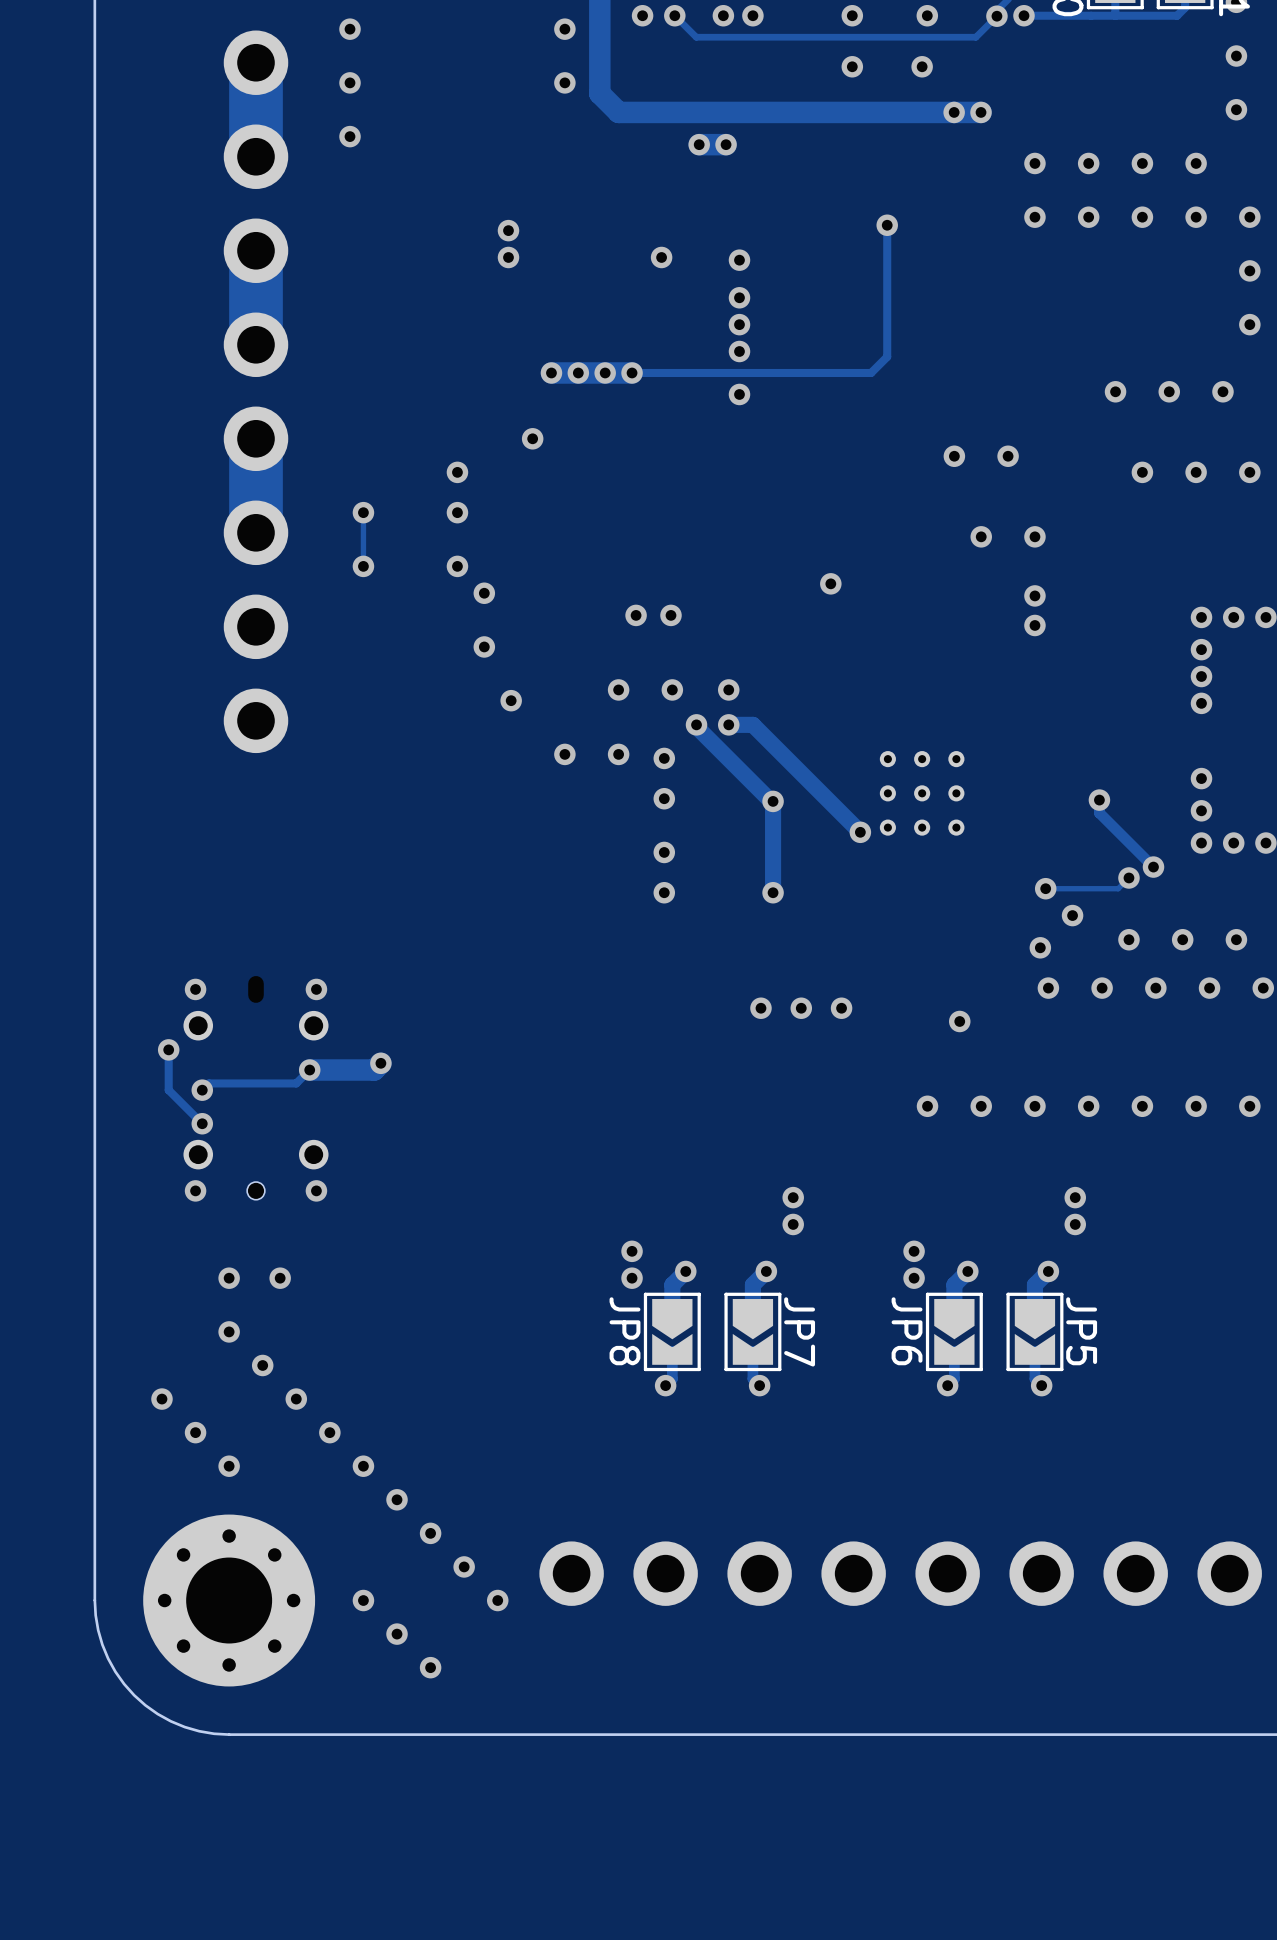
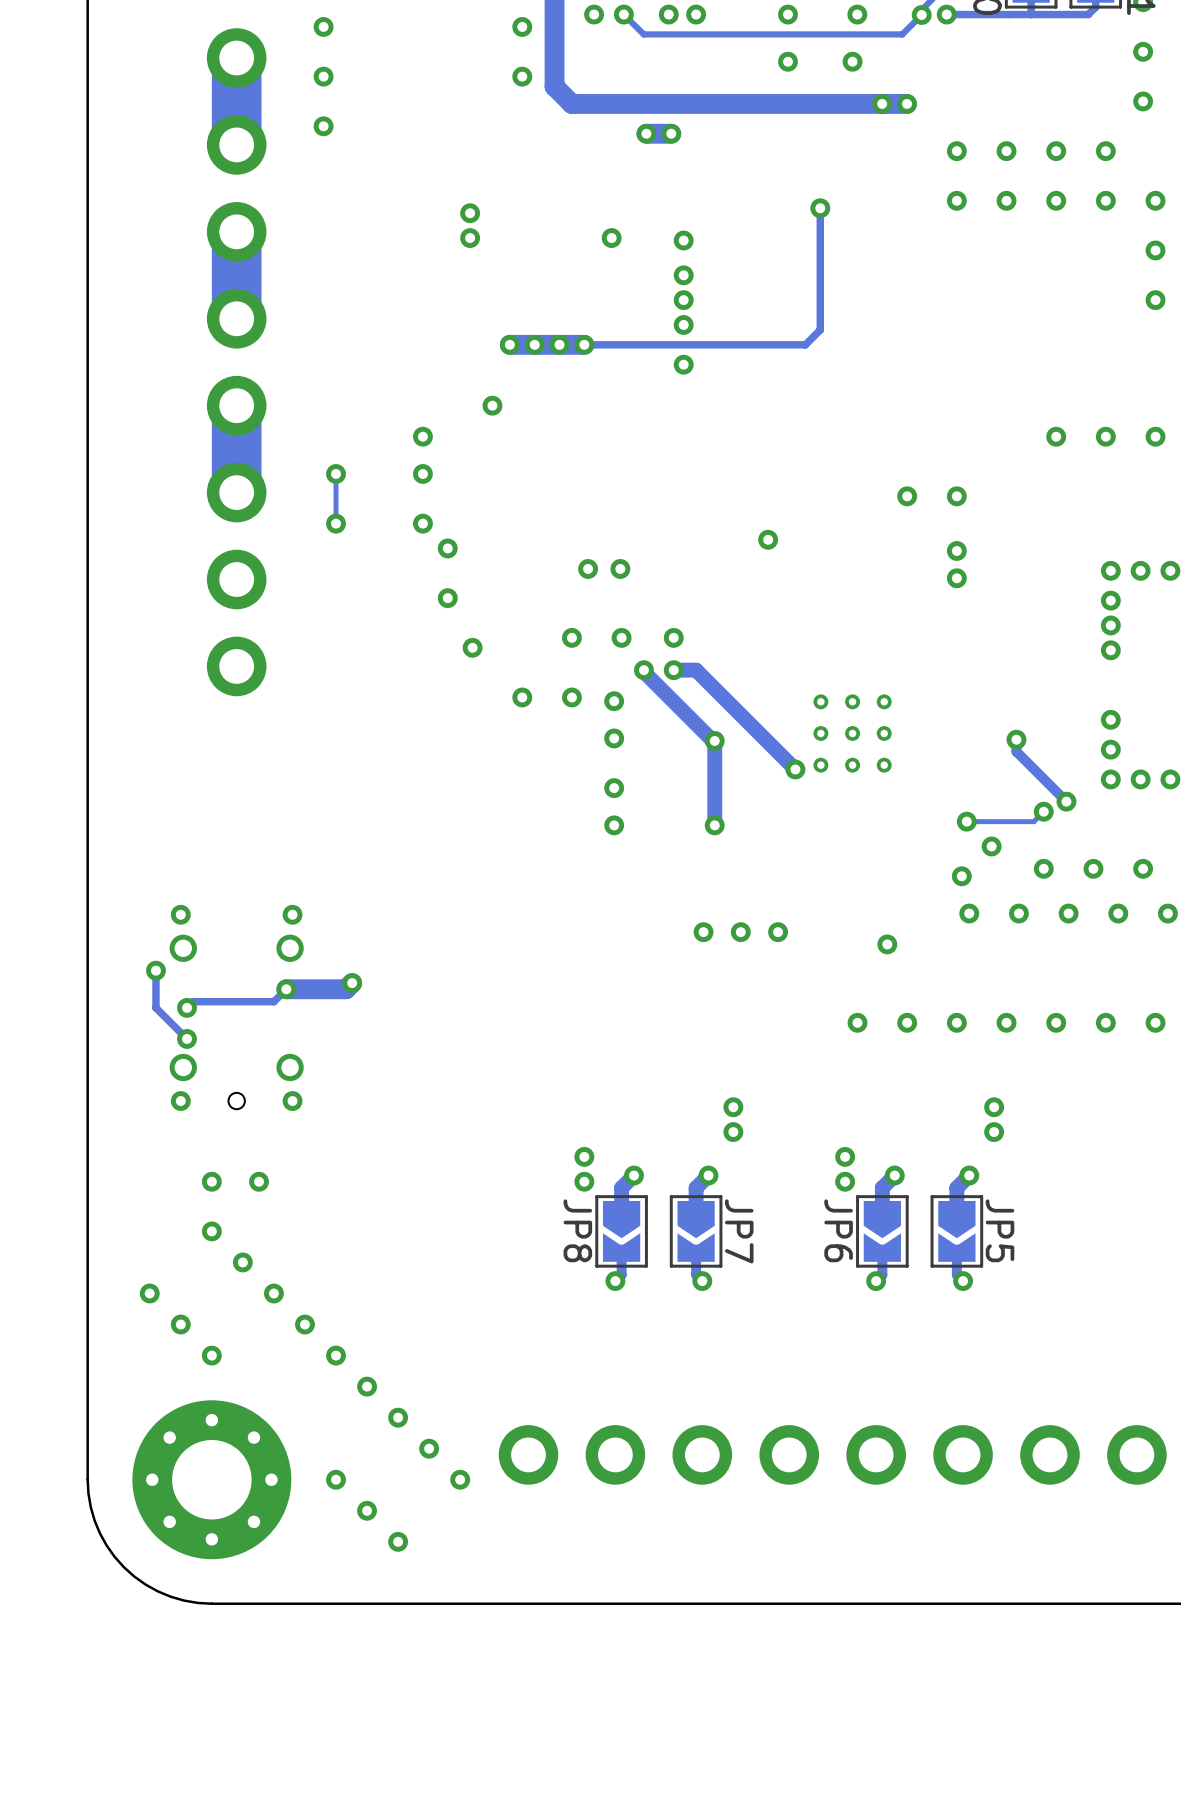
via: (1115, 391) -> none
via: (1169, 391) -> none
via: (1222, 391) -> none
via: (954, 456) -> none
via: (1008, 456) -> none

